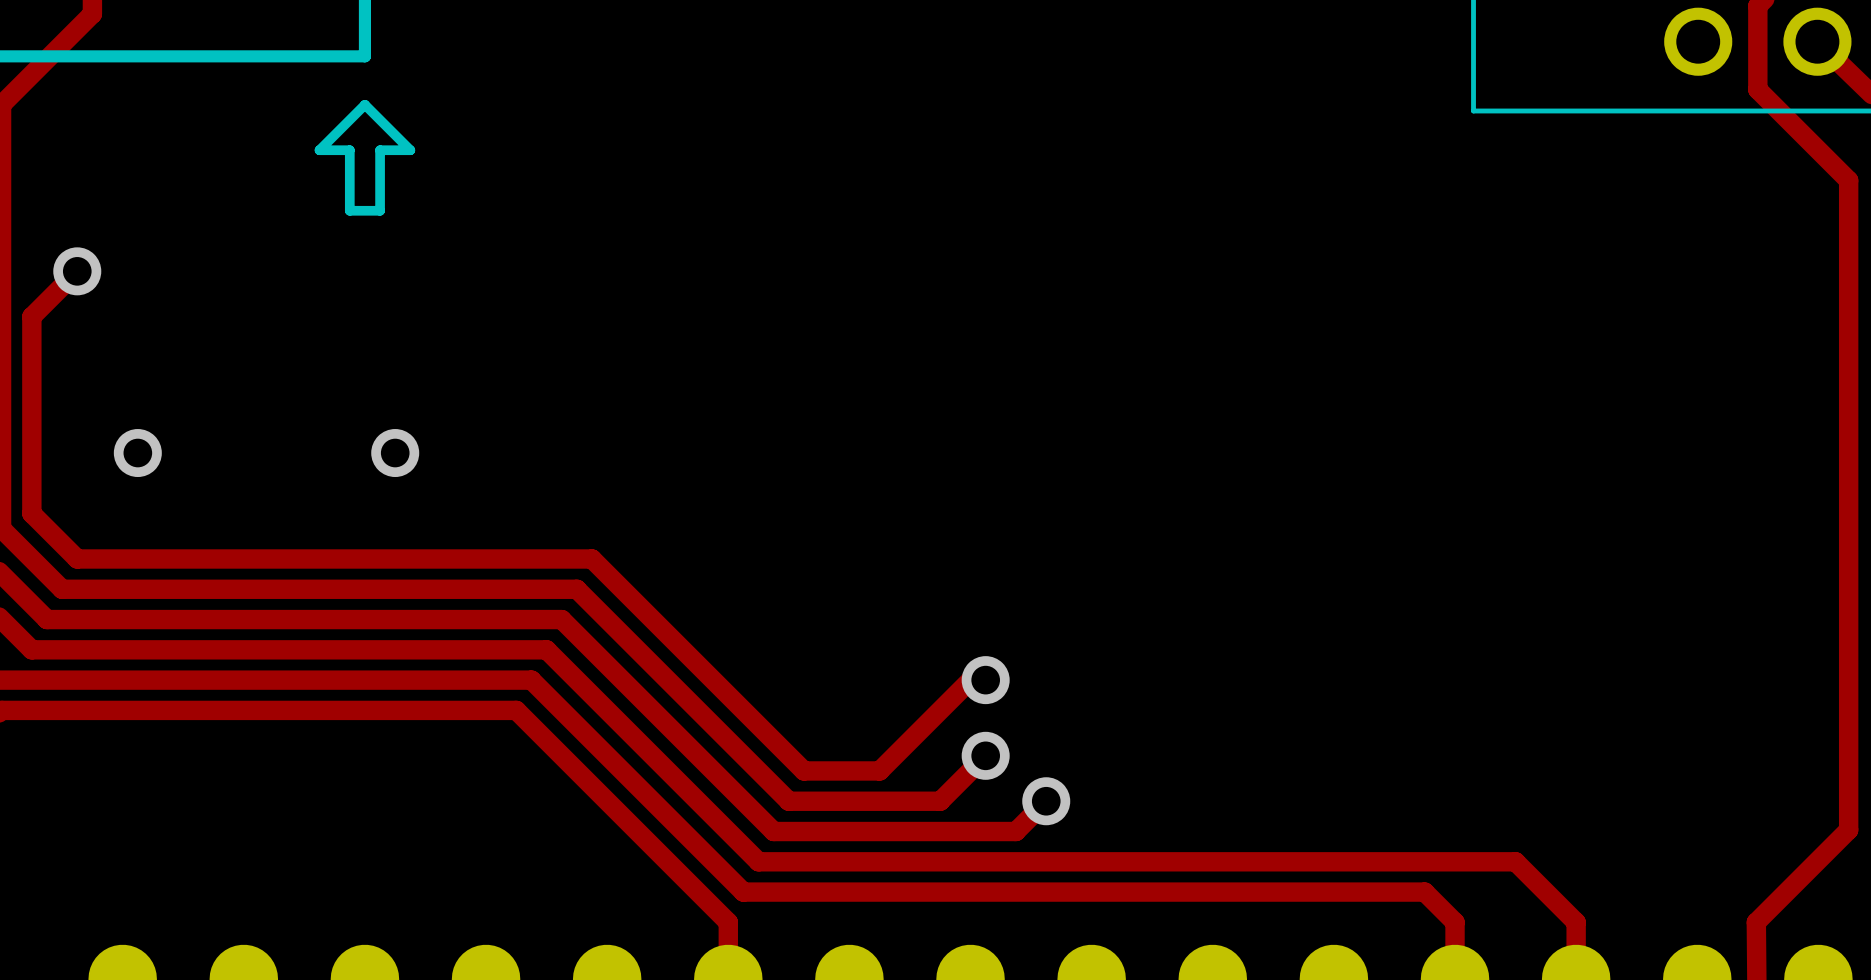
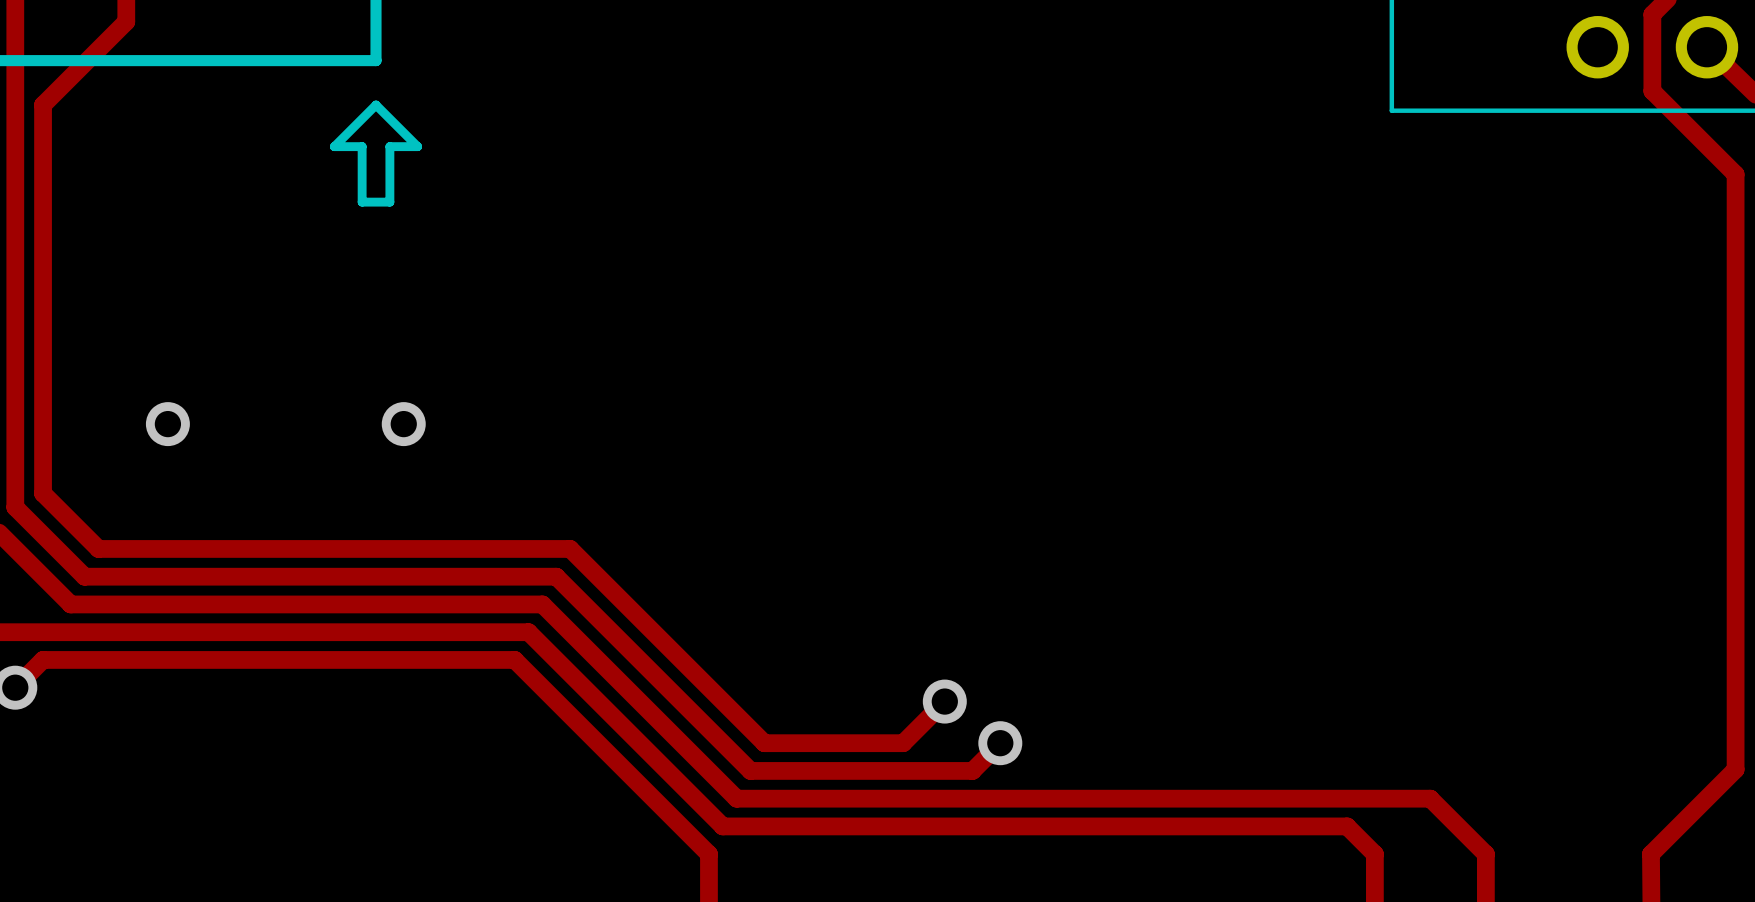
track: (77, 271) (31, 316) (31, 513) (77, 559) (592, 559) (804, 770) (879, 770) (970, 680) (985, 680) -> none
via: (77, 271) -> none
via: (985, 680) -> none

